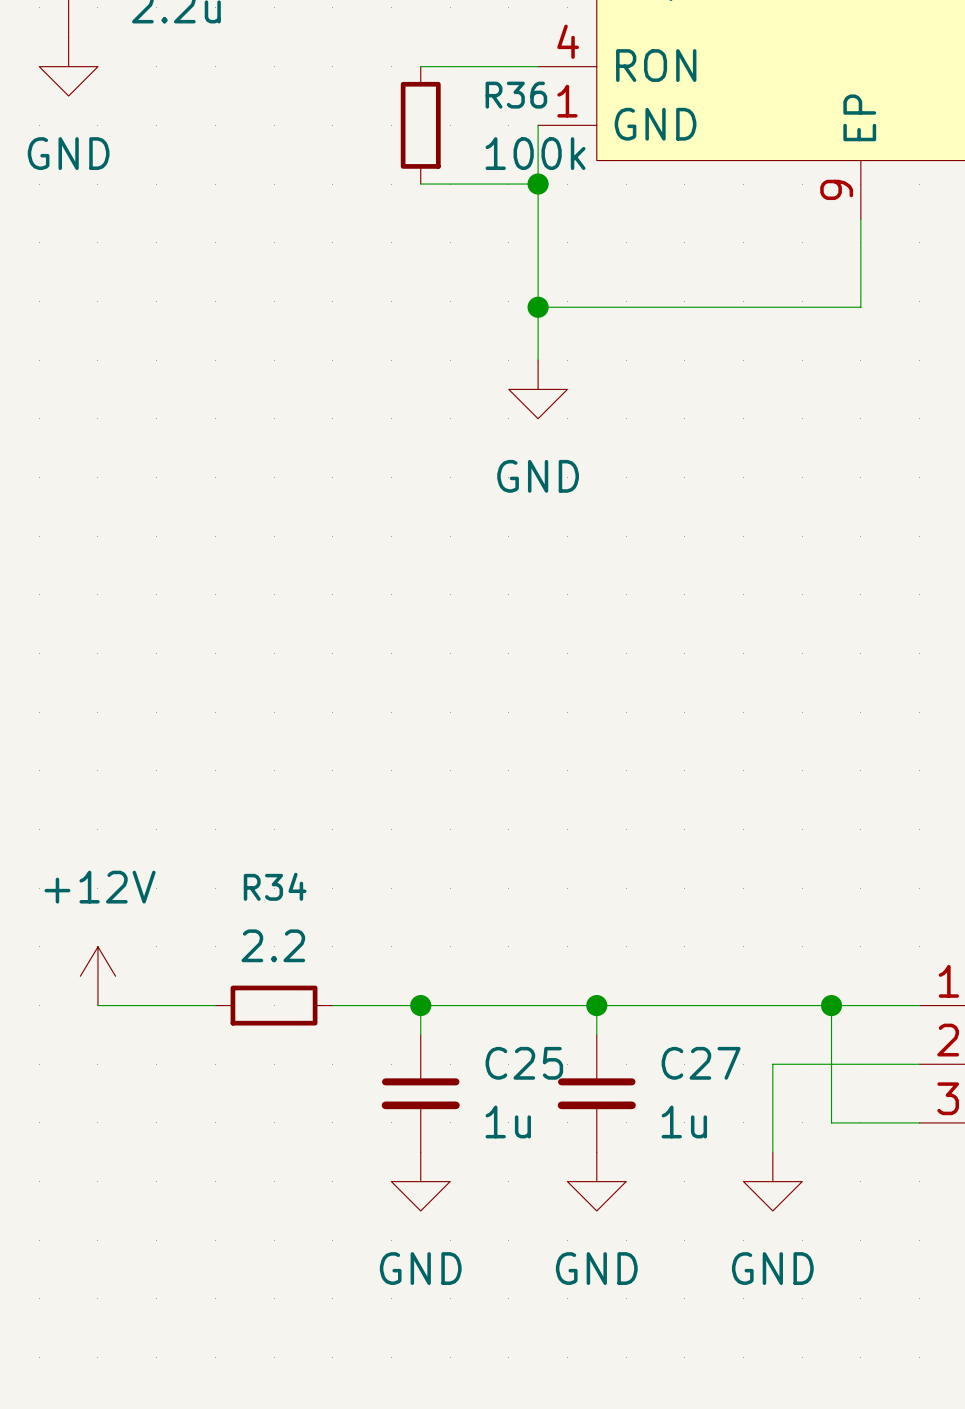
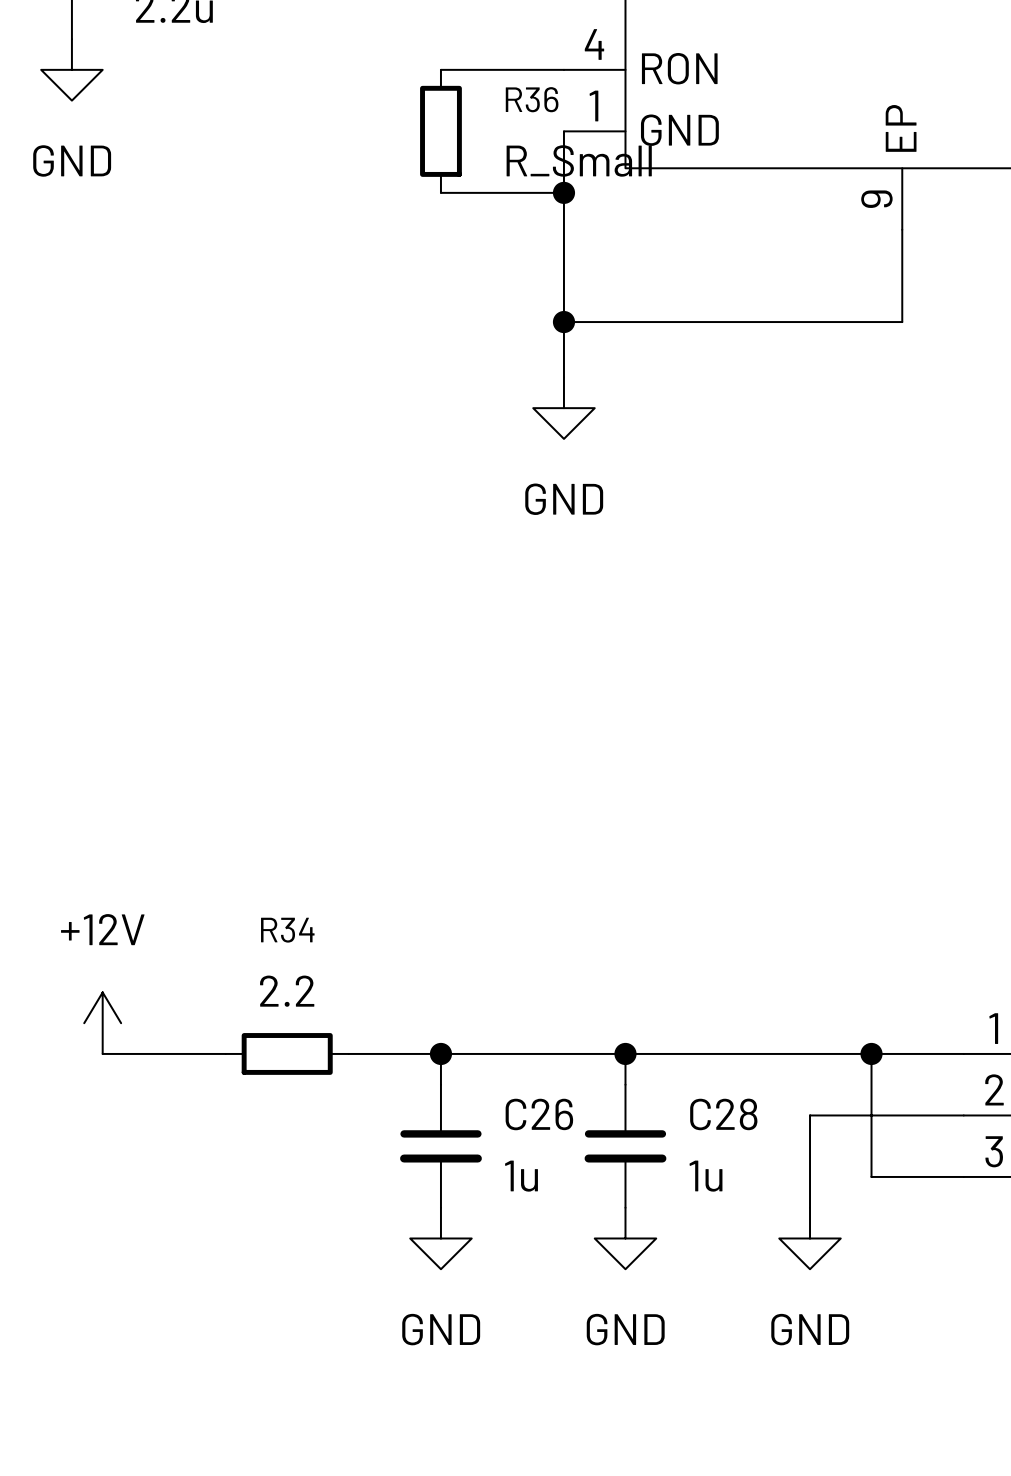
R36 value: 100k (535, 153) -> R_Small (579, 160)
C25 name: C25 (524, 1063) -> C26 (539, 1114)
C27 name: C27 (701, 1063) -> C28 (723, 1114)

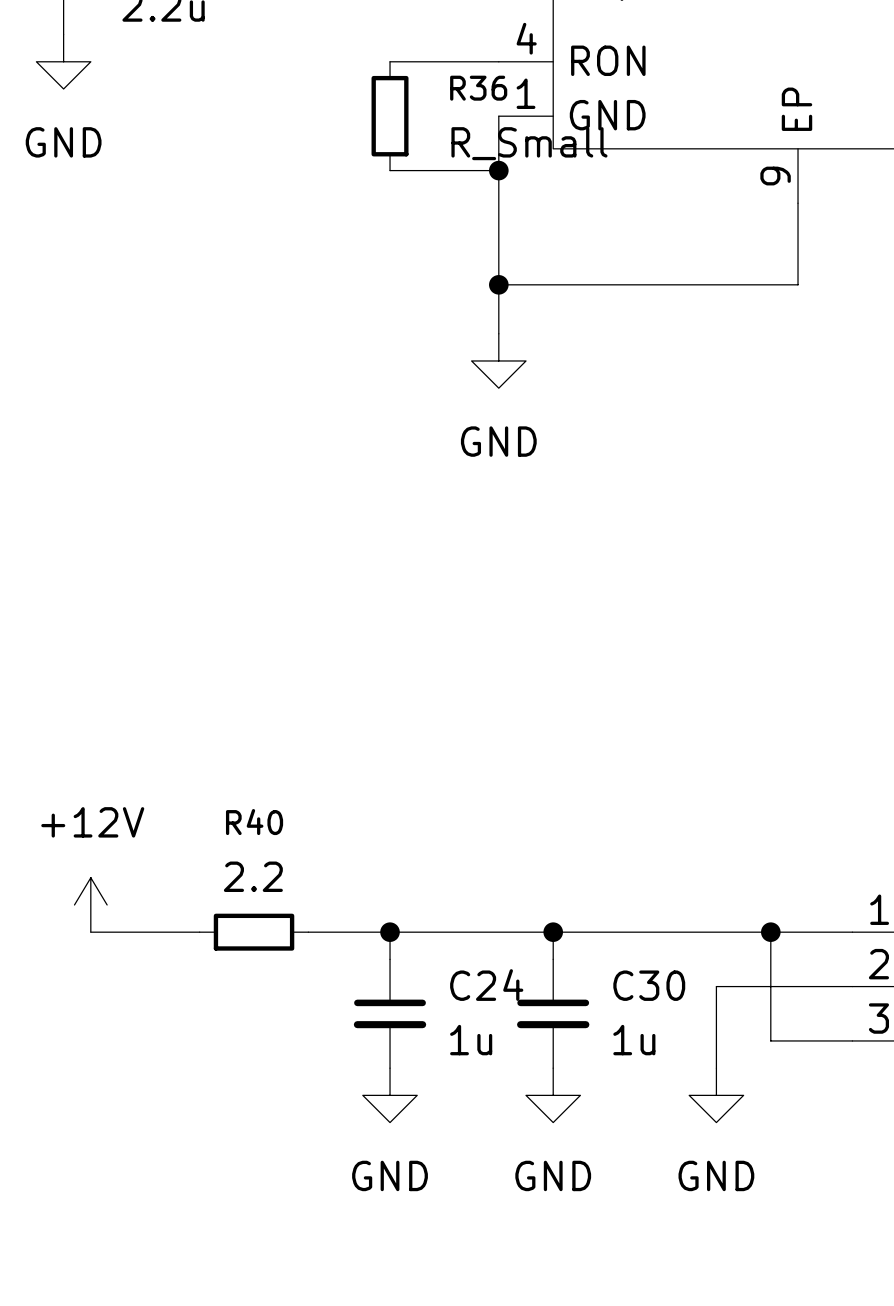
R34 name: R34 (287, 930) -> R40 (254, 822)
C26 name: C26 (539, 1114) -> C24 (486, 985)
C28 name: C28 (723, 1114) -> C30 (649, 985)

